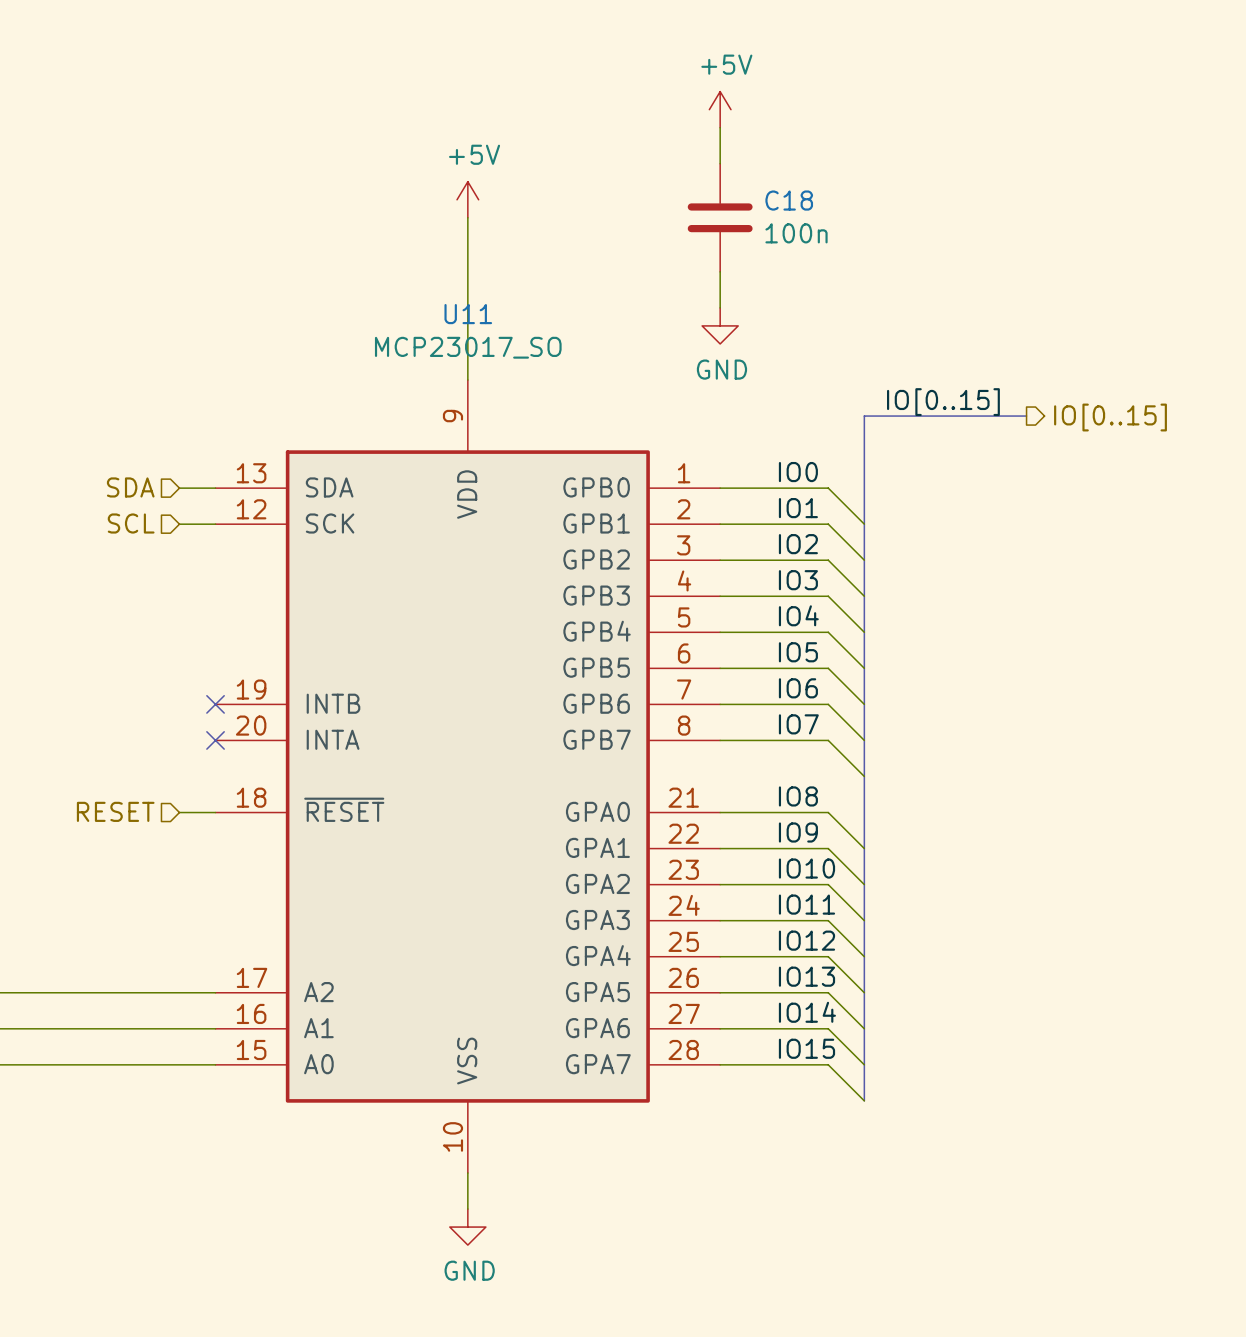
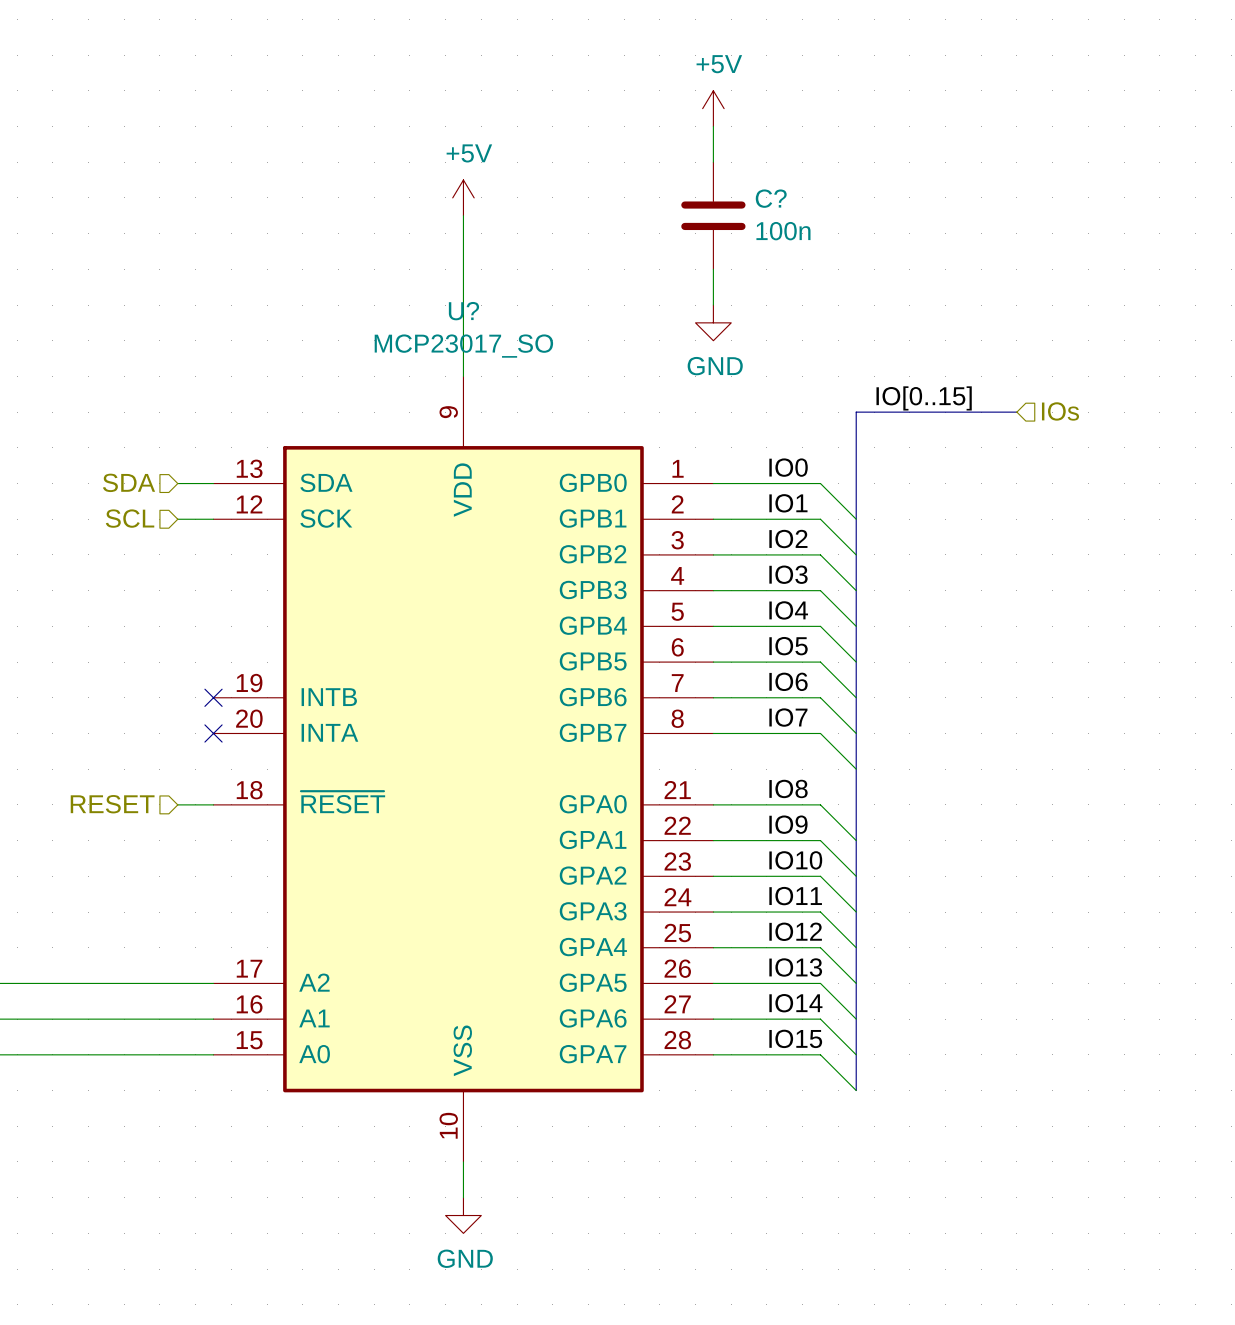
C18 name: C18 (789, 200) -> C? (771, 198)
U11 name: U11 (468, 314) -> U? (463, 311)
hierarchical label shape: output (1110, 417) -> input (1060, 411)
hierarchical label: IO[0..15] (1110, 417) -> IOs (1060, 411)

